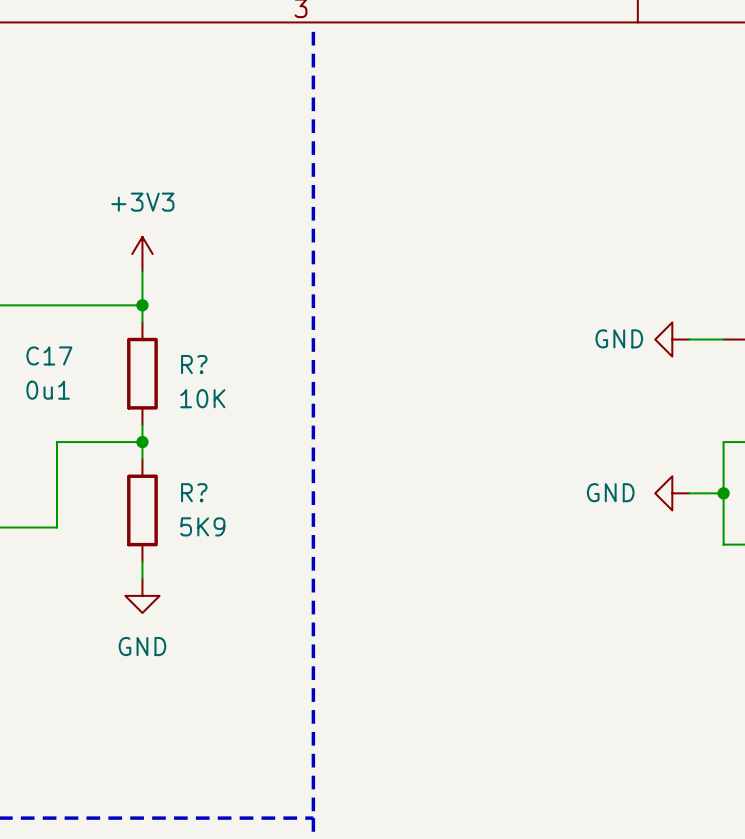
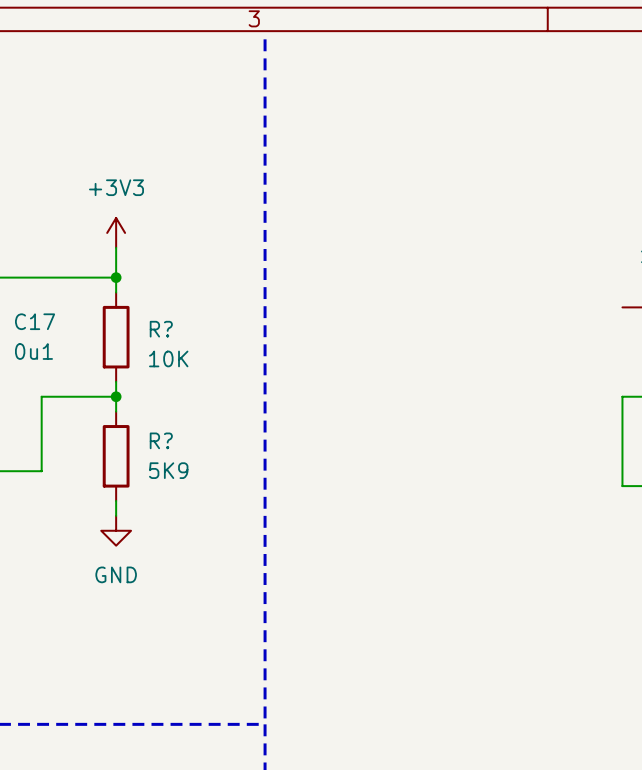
power symbol: GND (672, 339) -> none
wire: (689, 339) (723, 339) -> none
power symbol: GND (672, 493) -> none
wire: (689, 493) (723, 493) -> none
junction: (723, 493) -> none

